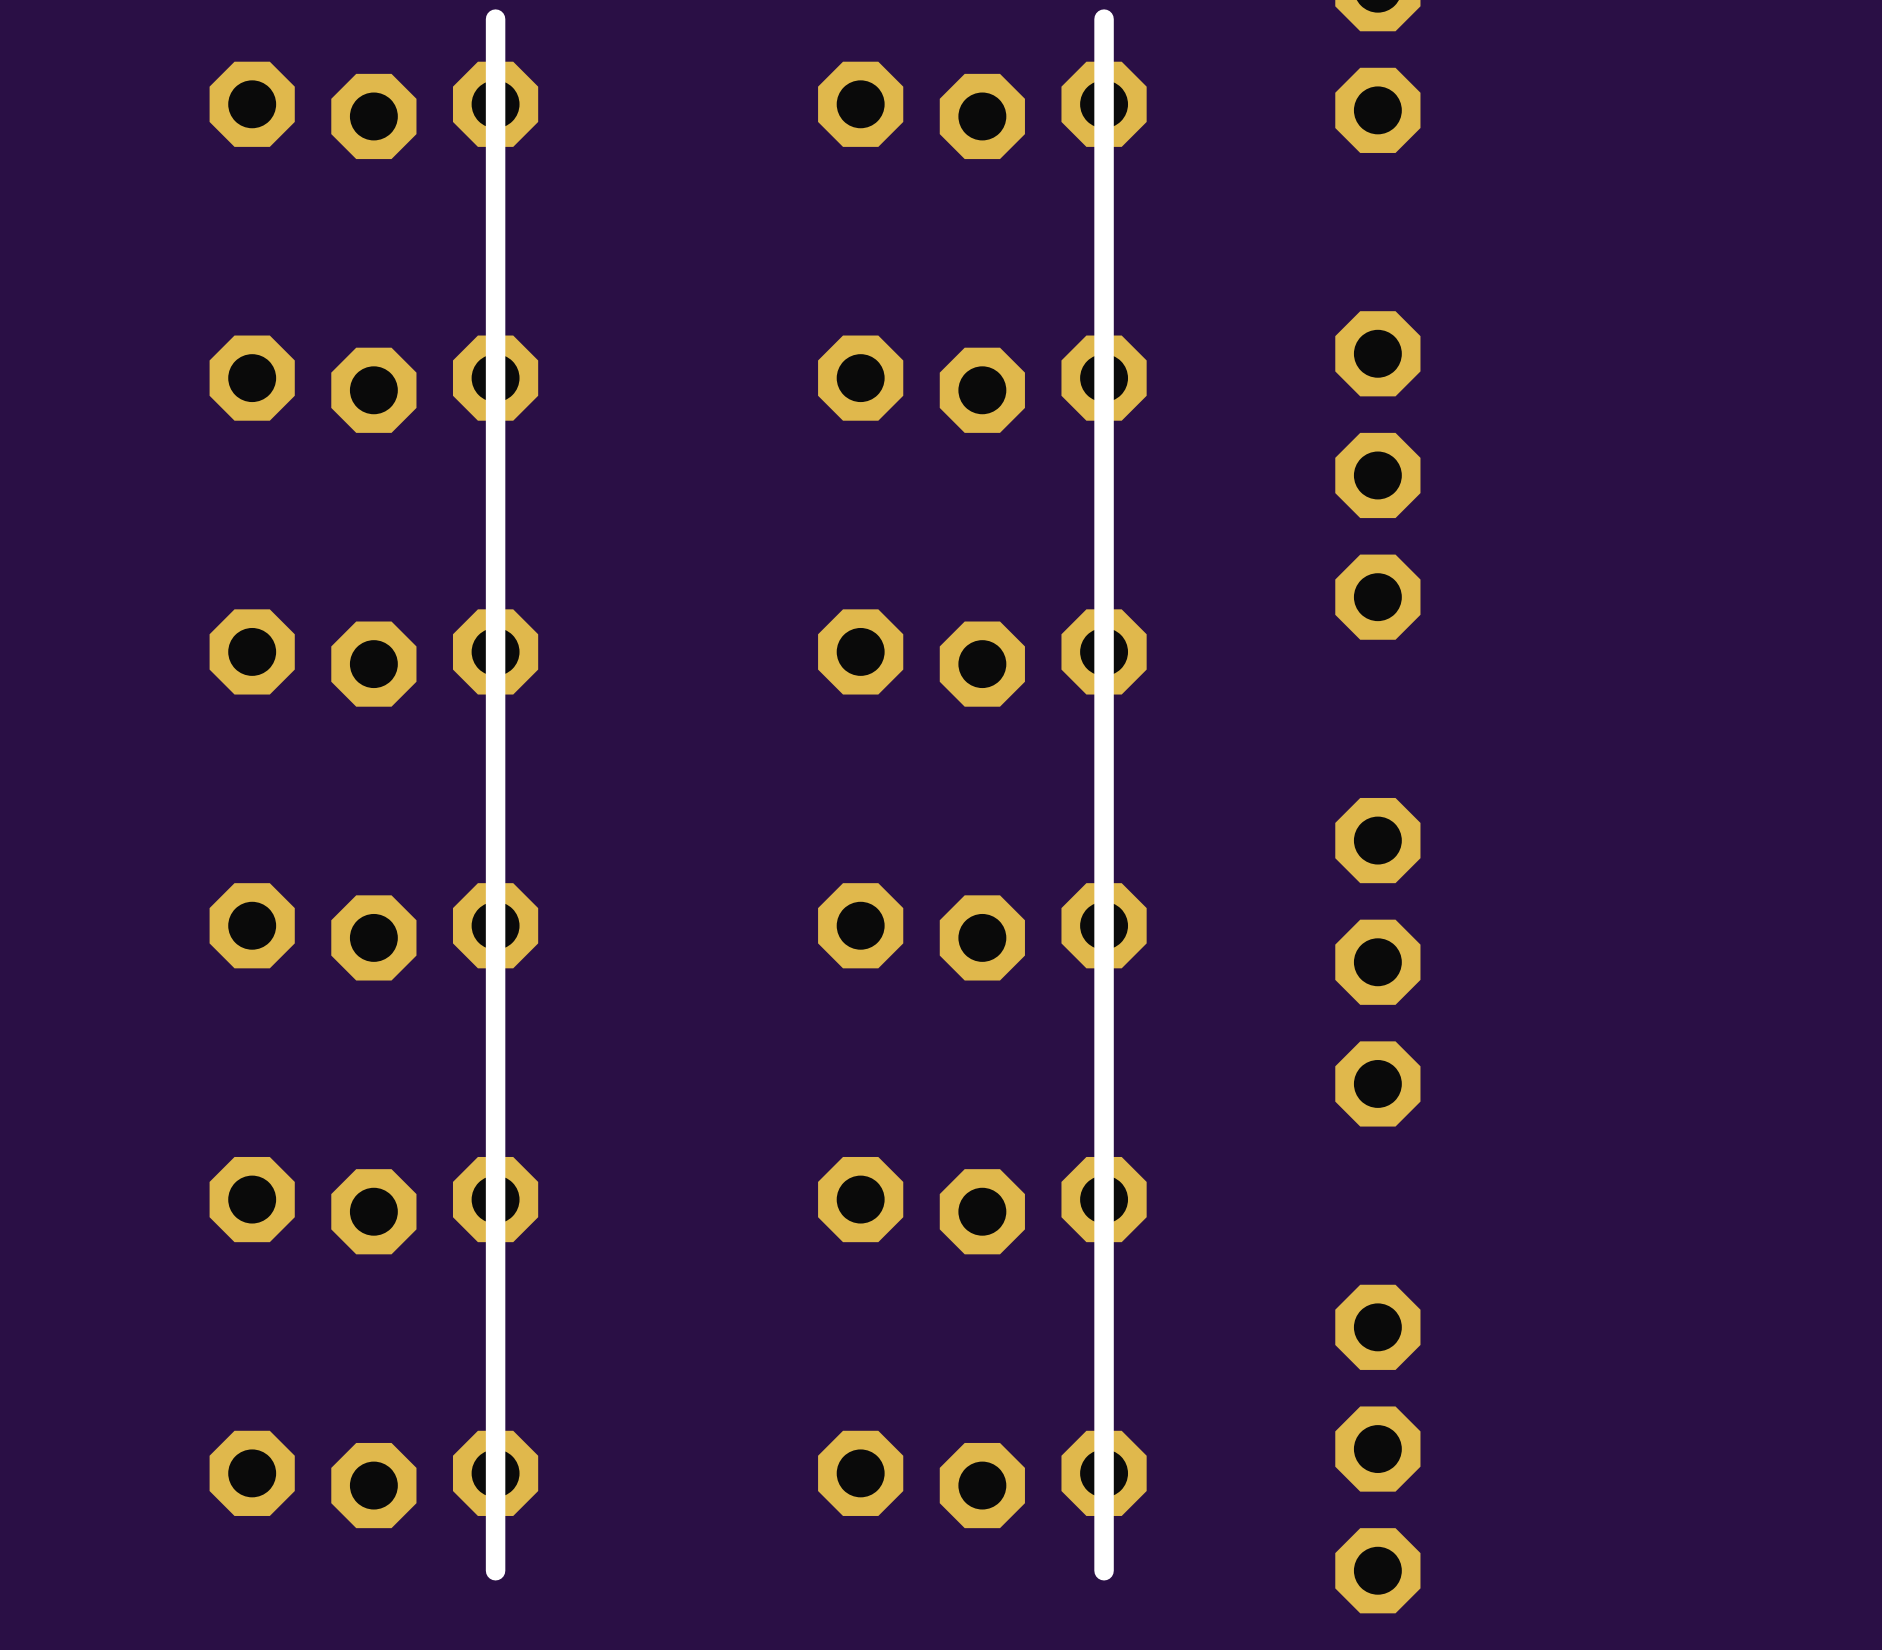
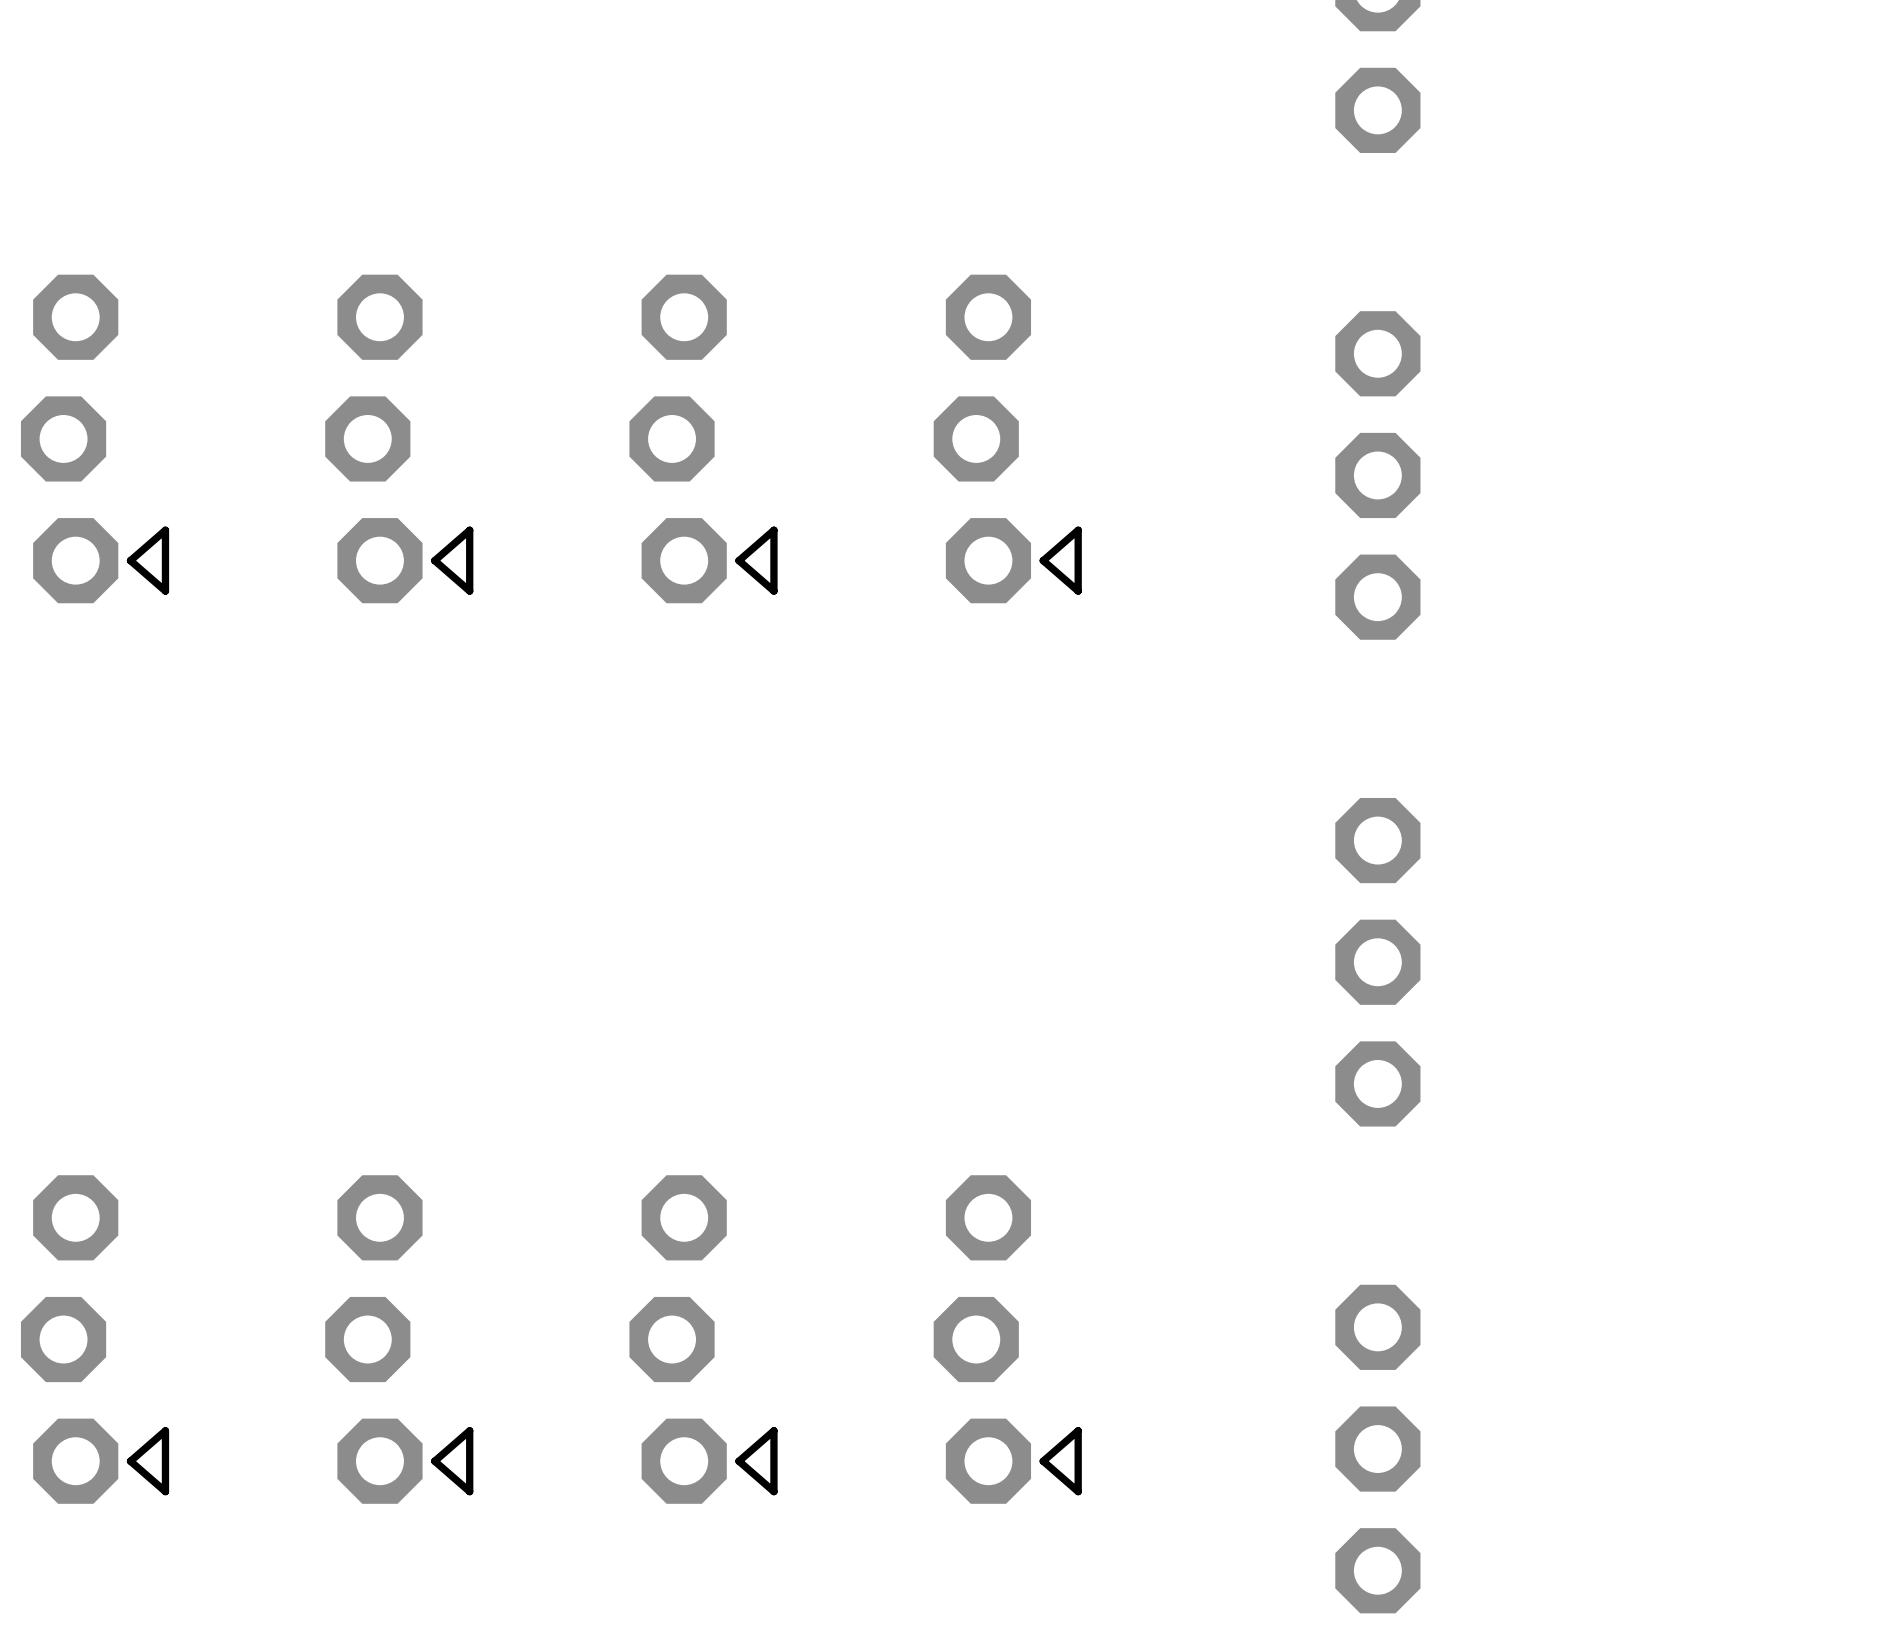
line: (495, 19) (495, 1570) -> none
line: (1104, 19) (1104, 1570) -> none
part: (373, 110) -> none
part: (982, 110) -> none
part: (373, 384) -> none
part: (982, 384) -> none
part: none -> (95, 438)
part: none -> (399, 438)
part: none -> (703, 438)
part: none -> (1007, 438)
part: (373, 658) -> none
part: (982, 658) -> none
part: (373, 931) -> none
part: (982, 931) -> none
part: (373, 1205) -> none
part: (982, 1205) -> none
part: none -> (95, 1339)
part: none -> (399, 1339)
part: none -> (703, 1339)
part: none -> (1007, 1339)
part: (373, 1479) -> none
part: (982, 1479) -> none

